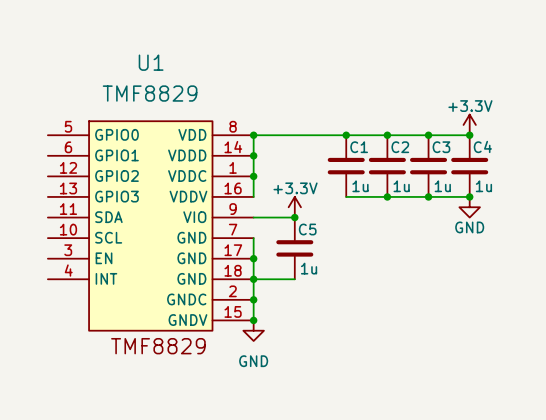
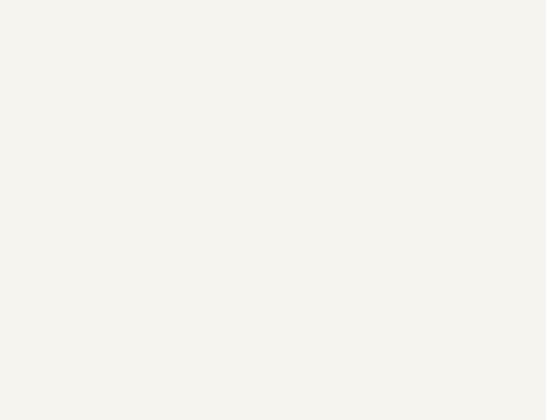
power symbol: +3.3V (469, 124) -> none
junction: (253, 135) -> none
junction: (346, 135) -> none
junction: (387, 135) -> none
junction: (428, 135) -> none
wire: (469, 135) (253, 135) (253, 196) -> none
junction: (469, 135) -> none
junction: (253, 155) -> none
C1: 1u (346, 166) -> none
C2: 1u (387, 166) -> none
C3: 1u (428, 166) -> none
C4: 1u (469, 166) -> none
junction: (253, 176) -> none
wire: (346, 196) (469, 196) -> none
junction: (387, 196) -> none
junction: (428, 196) -> none
junction: (469, 196) -> none
power symbol: +3.3V (294, 207) -> none
power symbol: GND (469, 207) -> none
wire: (253, 217) (294, 217) -> none
junction: (294, 217) -> none
U1: TMF8829 (150, 225) -> none
wire: (253, 238) (253, 320) -> none
C5: 1u (294, 248) -> none
junction: (253, 258) -> none
wire: (253, 279) (294, 279) -> none
junction: (253, 279) -> none
junction: (253, 299) -> none
junction: (253, 320) -> none
power symbol: GND (253, 330) -> none

